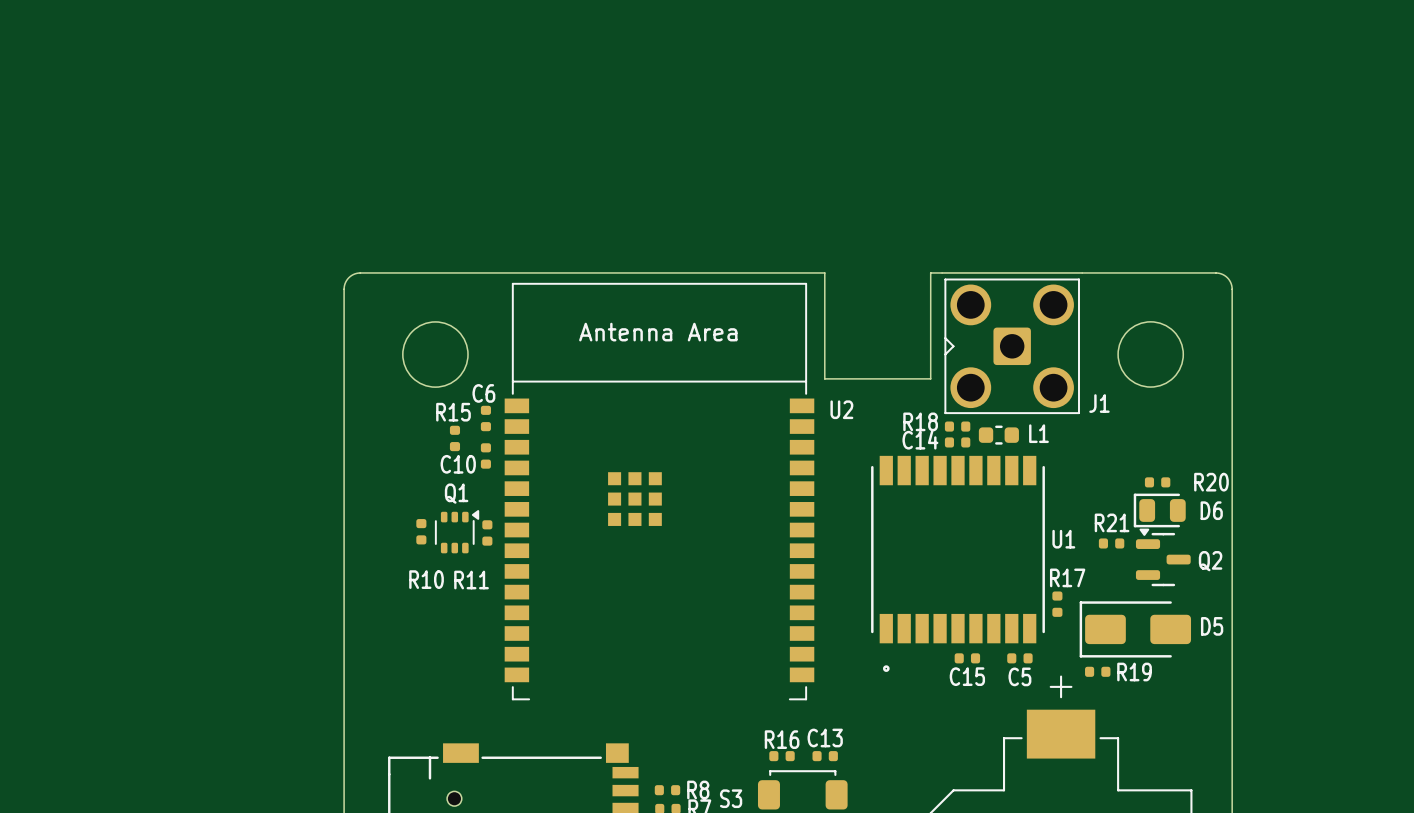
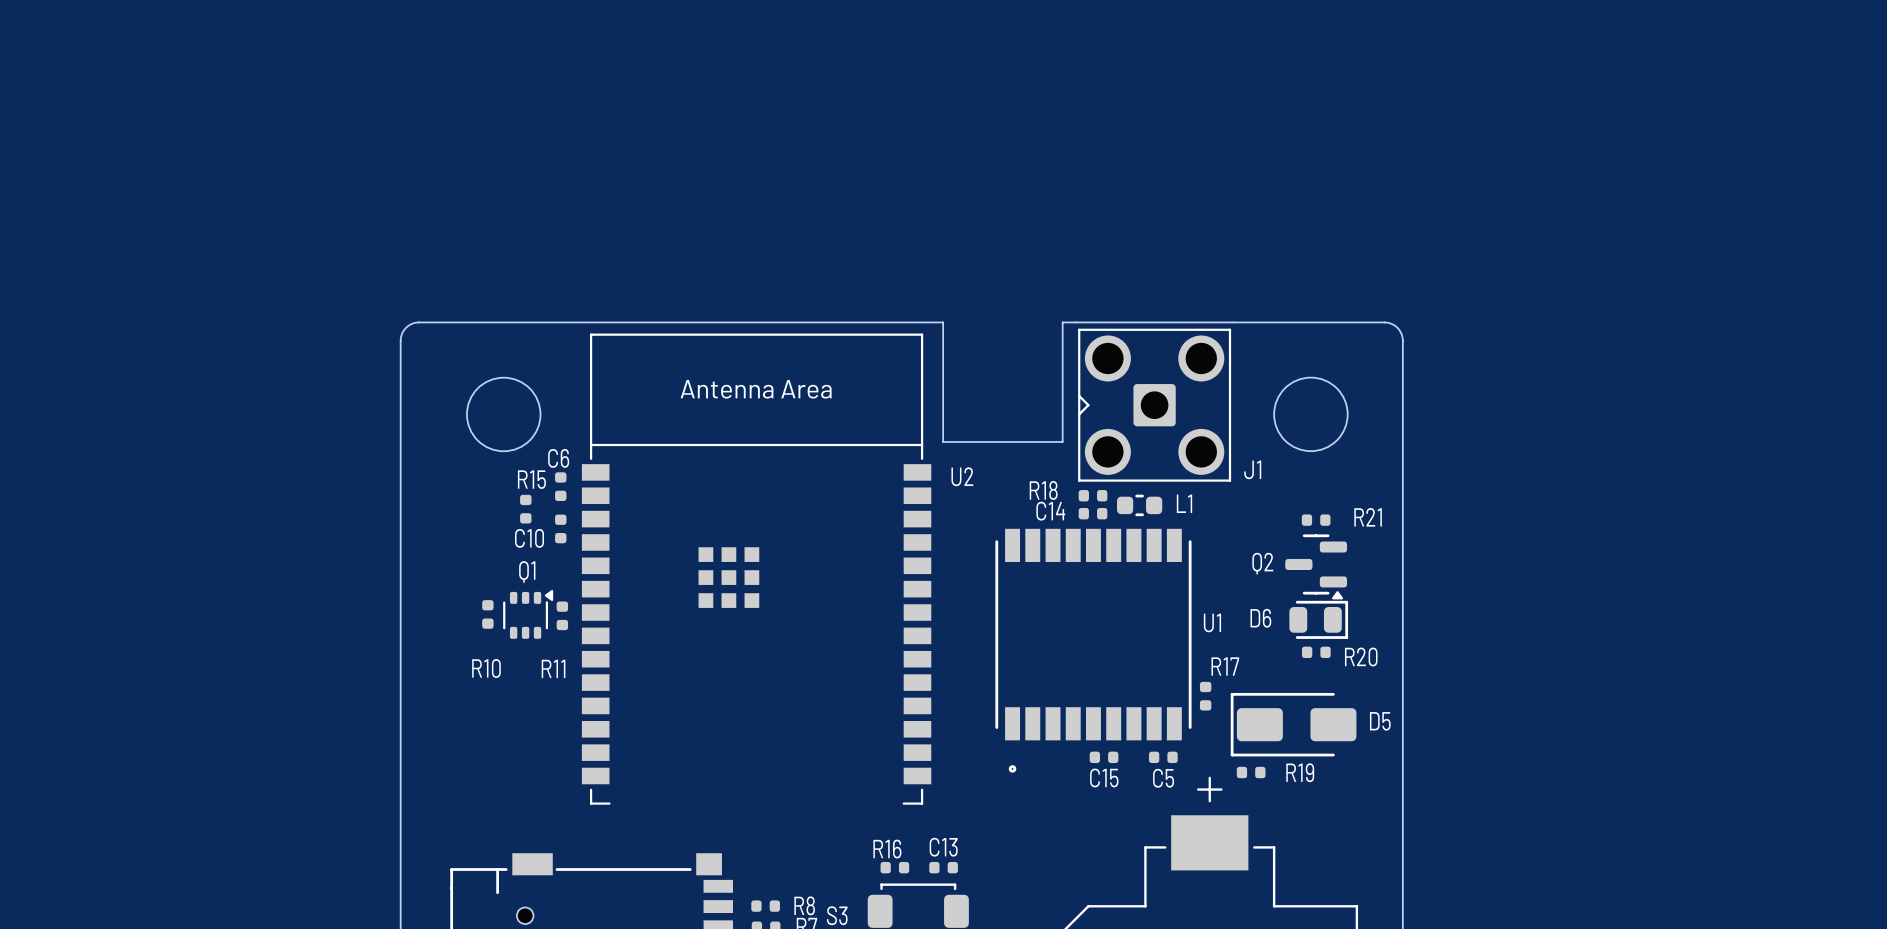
R20 position: (1157, 482) -> (1316, 652)
R20 name position: R20 (1211, 482) -> R20 (1361, 656)
D6 rotation: 0° (1159, 510) -> 180° (1318, 619)
R21 name position: R21 (1112, 522) -> R21 (1368, 517)
R21 position: (1111, 543) -> (1316, 520)
Q2 rotation: 0° (1163, 557) -> 180° (1316, 566)
Q2 position: (1163, 557) -> (1316, 566)

